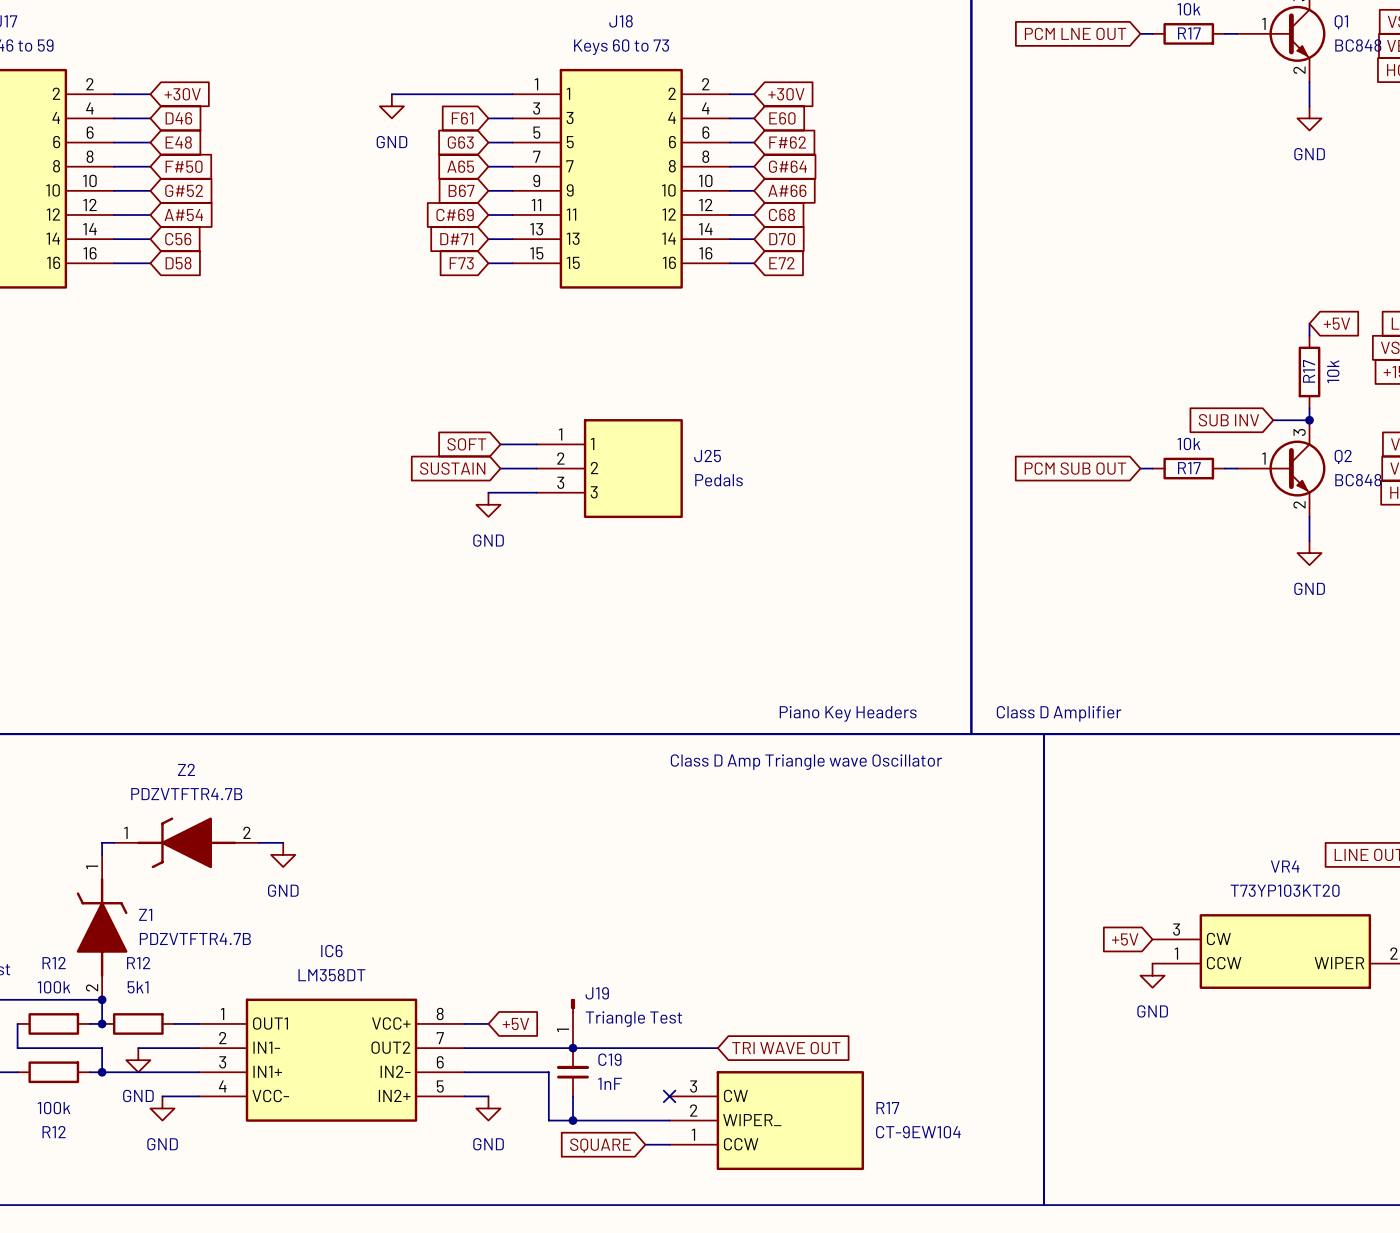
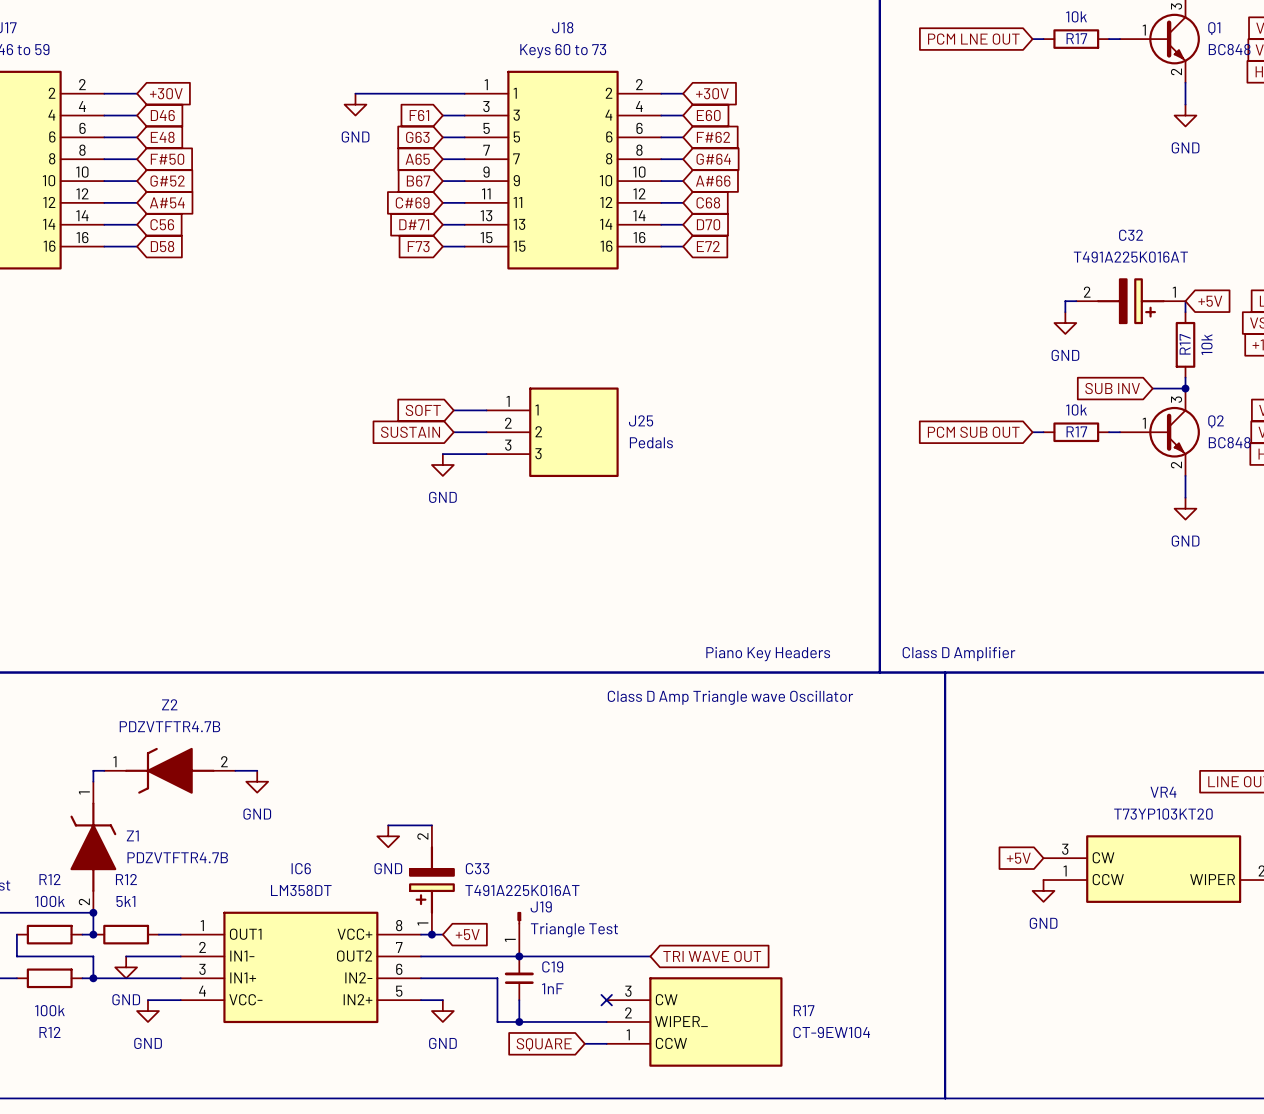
wire: none -> (1076, 301) (1065, 301) (1065, 312)
C32: none -> T491A225K016AT (1130, 301)
power symbol: none -> GND (1065, 323)
wire: none -> (388, 825) (431, 825)
power symbol: none -> GND (388, 836)
C33: none -> T491A225K016AT (431, 880)
junction: none -> (431, 934)

